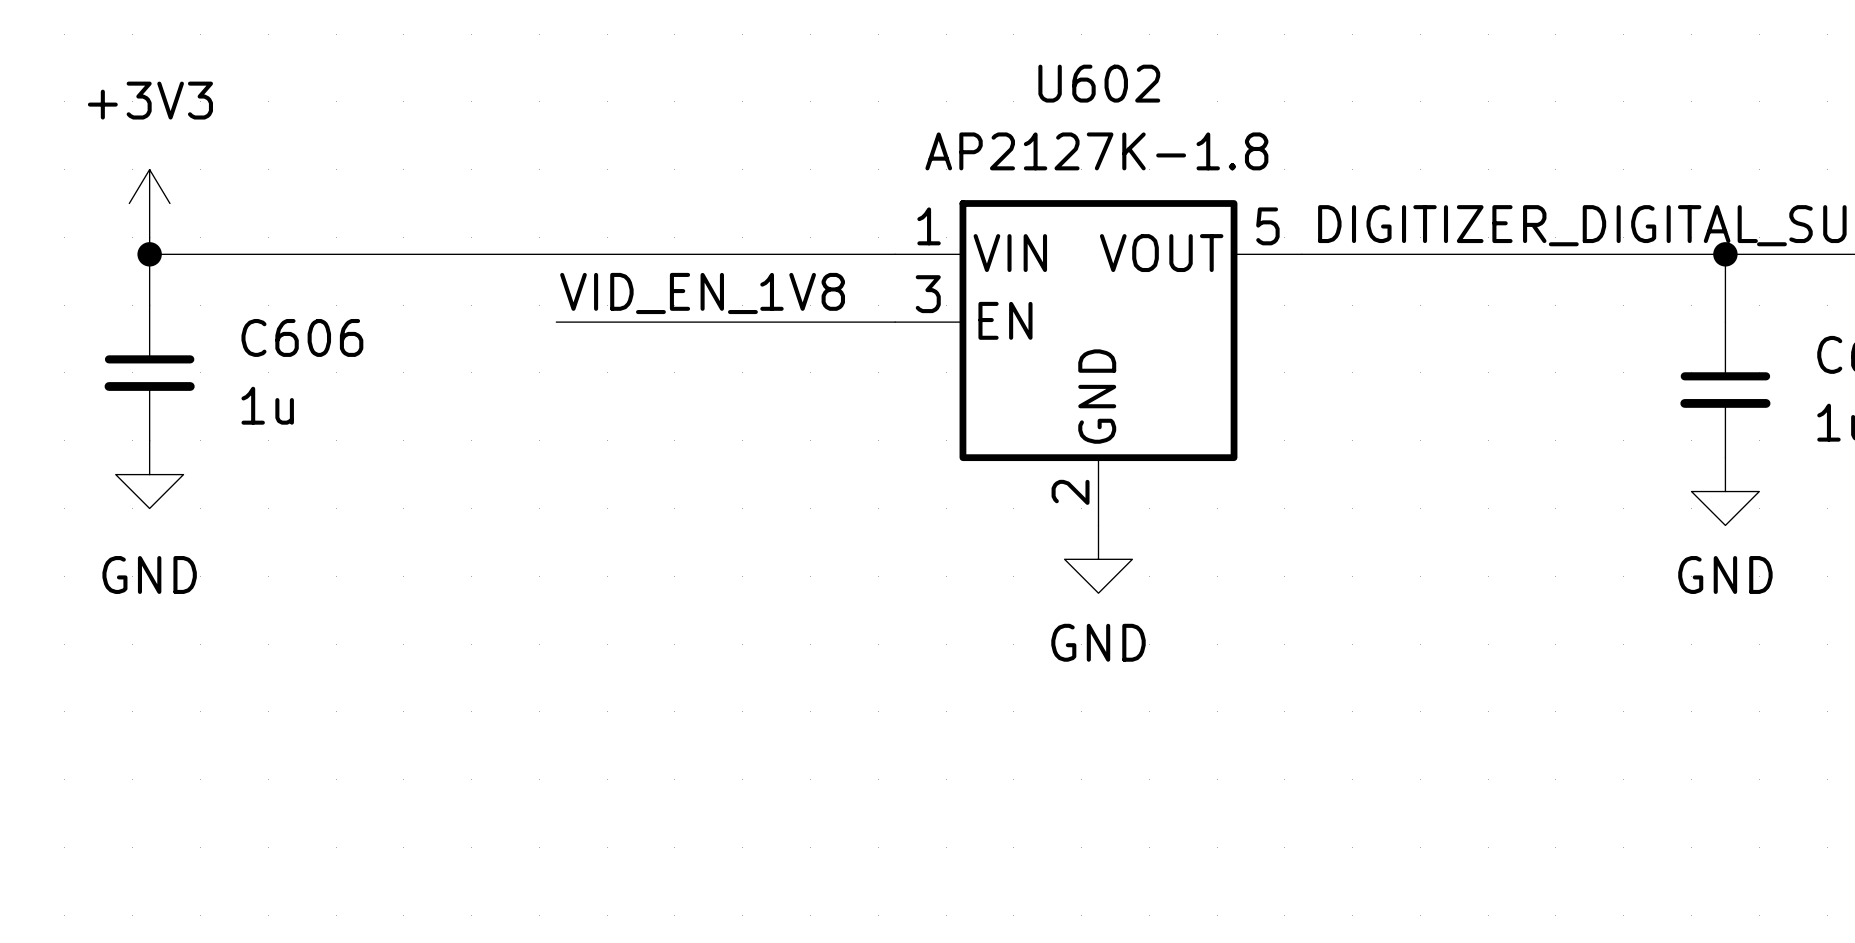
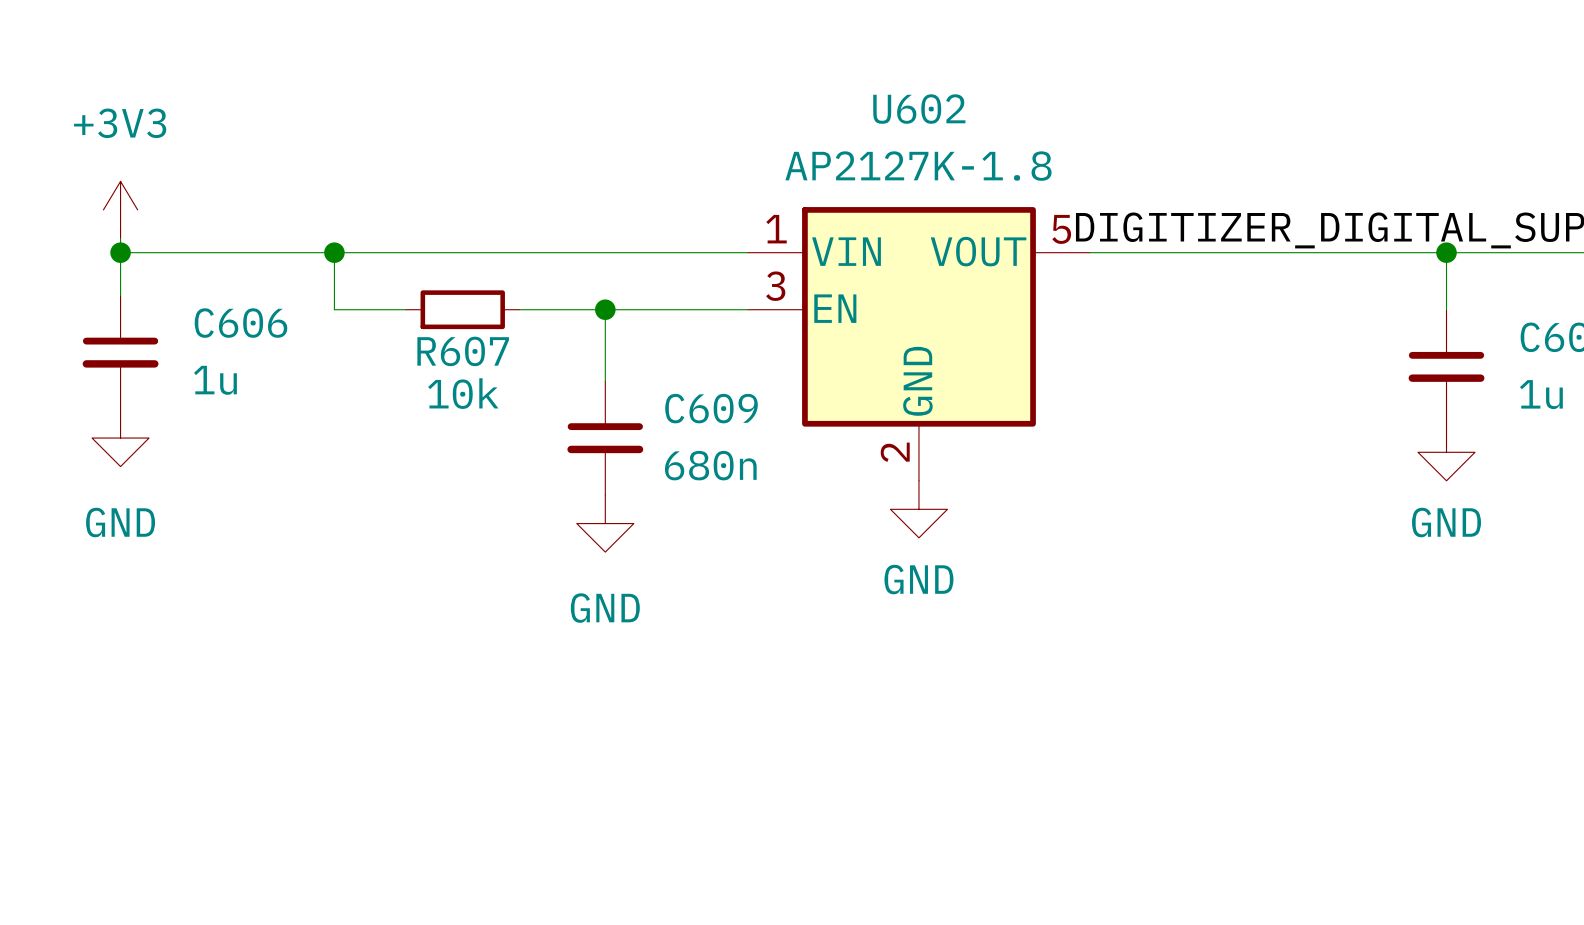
wire: none -> (334, 252) (334, 309) (405, 309)
junction: none -> (334, 252)
label: VID_EN_1V8 (702, 293) -> none
wire: (556, 322) (624, 322) -> none
R607: none -> 10k (462, 309)
wire: none -> (605, 309) (605, 381)
junction: none -> (605, 309)
C609: none -> 680n (605, 438)
power symbol: none -> GND (605, 523)

